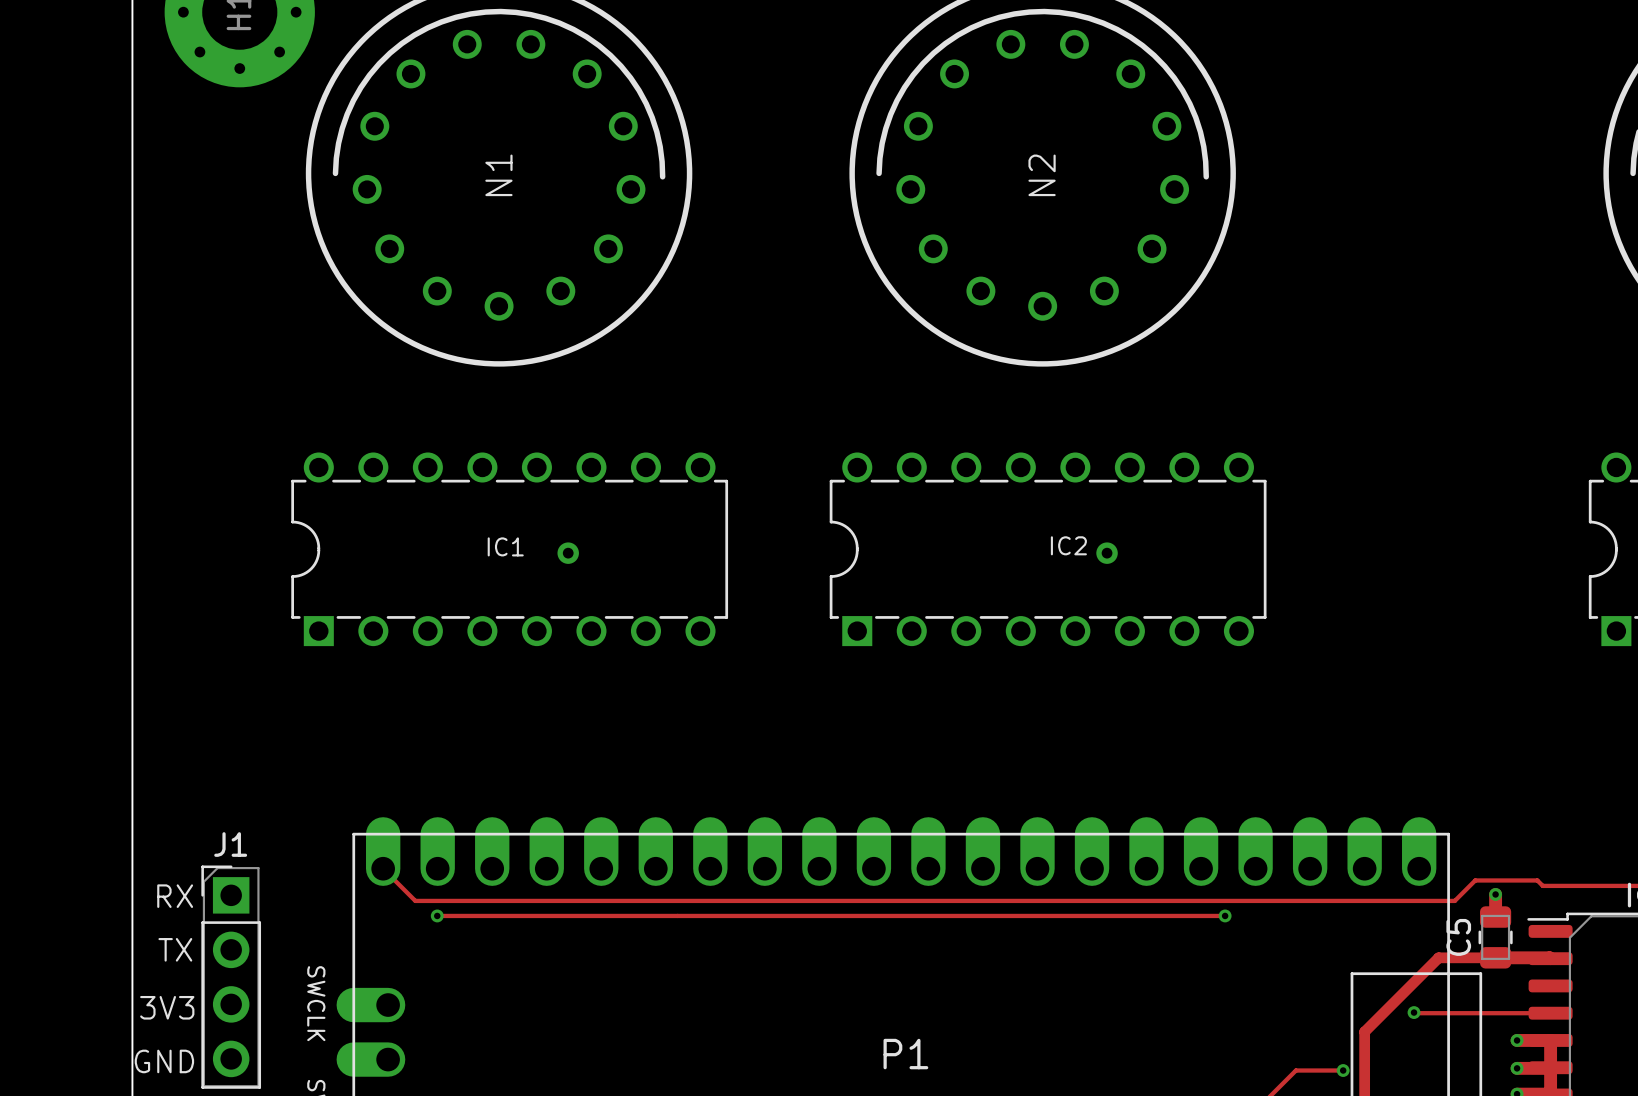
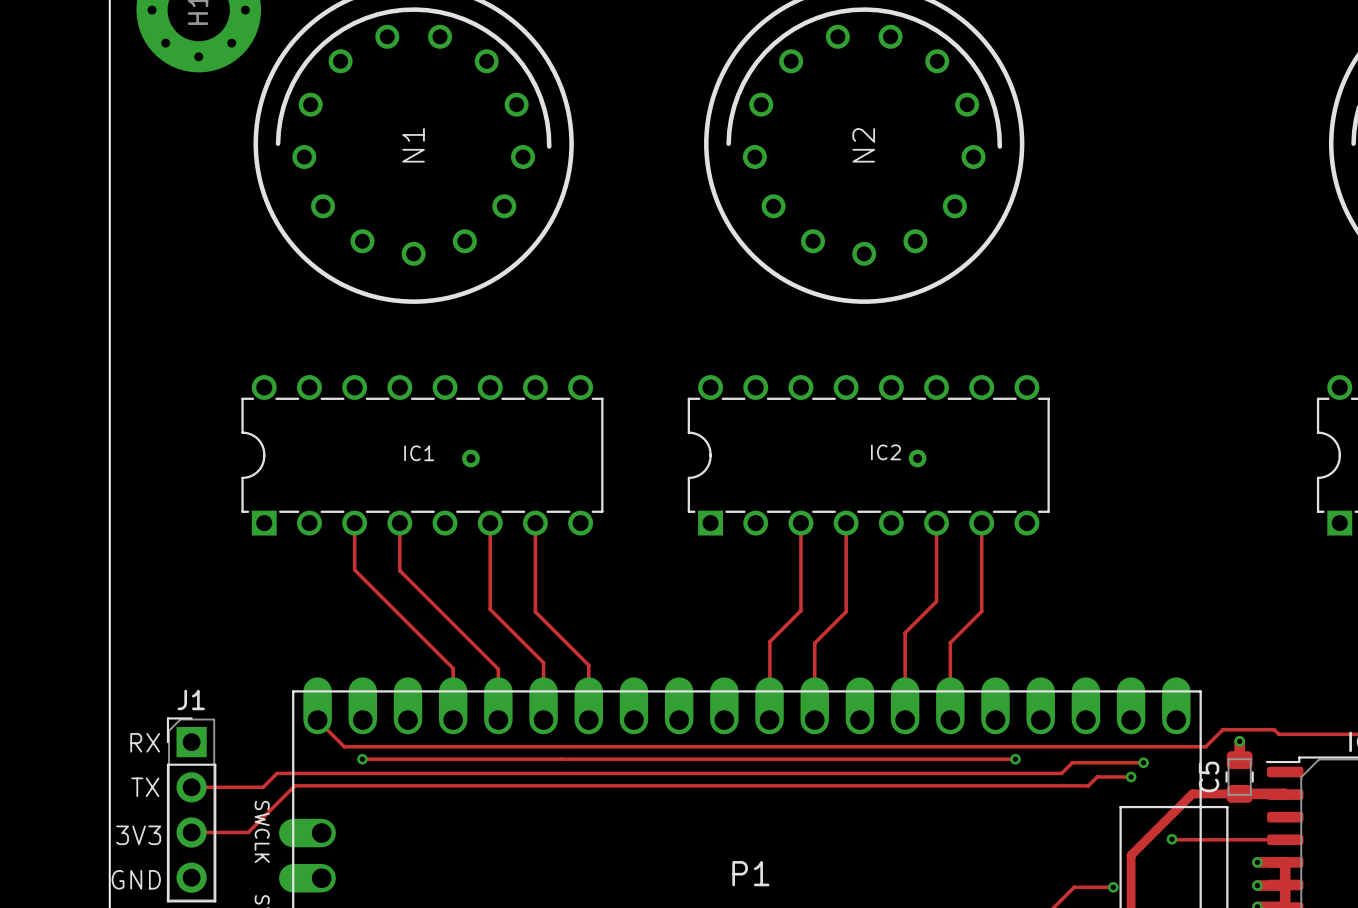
track: none -> (354, 523) (354, 569) (453, 668) (453, 720)
track: none -> (399, 523) (399, 570) (498, 669) (498, 720)
track: none -> (490, 523) (490, 609) (543, 662) (543, 720)
track: none -> (535, 523) (535, 611) (588, 665) (588, 720)
track: none -> (800, 523) (800, 610) (769, 641) (769, 720)
track: none -> (846, 523) (846, 611) (814, 643) (814, 720)
track: none -> (936, 523) (936, 601) (905, 632) (905, 720)
track: none -> (981, 523) (981, 611) (950, 642) (950, 720)
track: none -> (1143, 762) (1072, 762) (1061, 773) (277, 773) (263, 787) (191, 787)
via: none -> (1143, 762)
track: none -> (1131, 776) (1097, 776) (1088, 785) (294, 785) (248, 832) (191, 832)
via: none -> (1131, 776)

